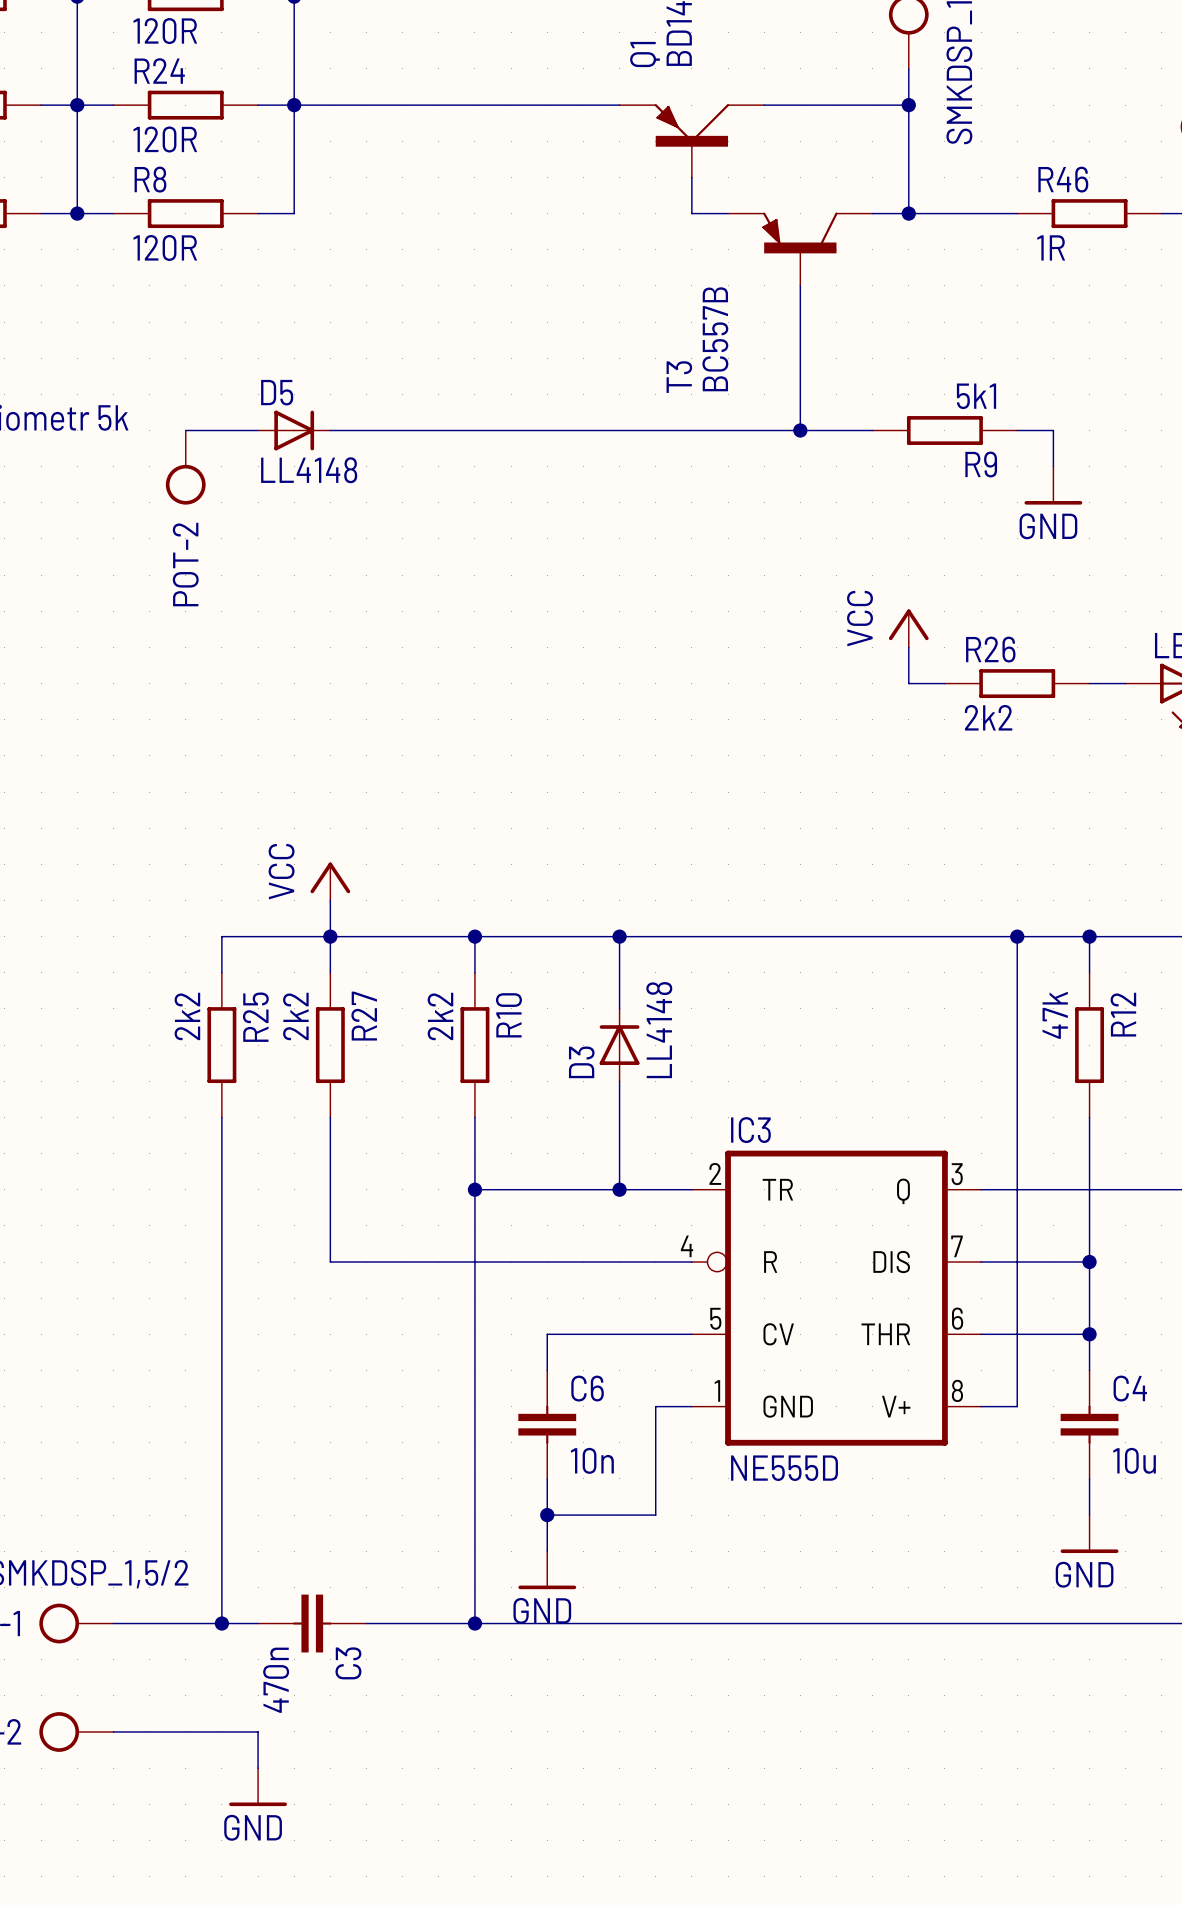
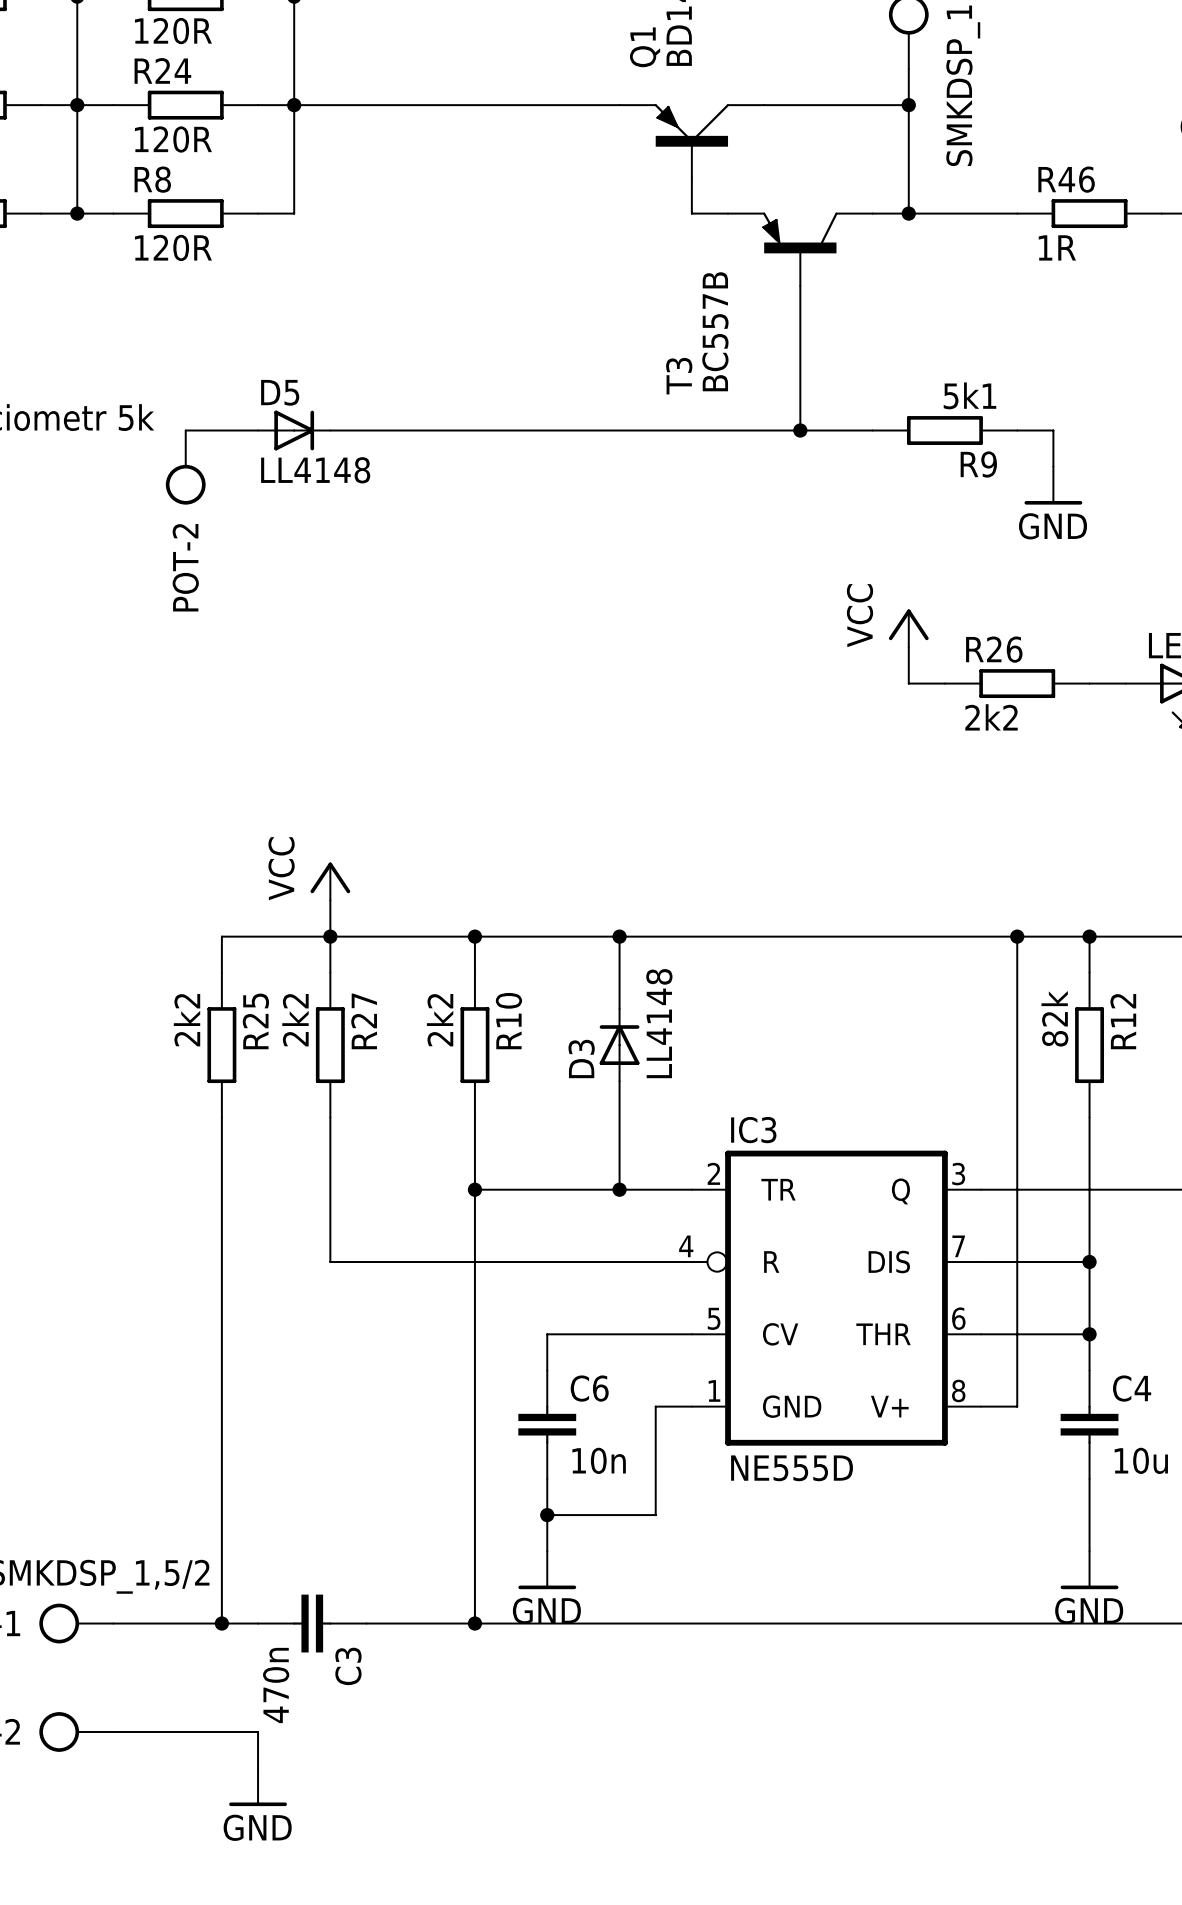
R12 value: 47k (1055, 1015) -> 82k (1054, 1018)
power symbol position: GND (1089, 1534) -> GND (1089, 1570)

